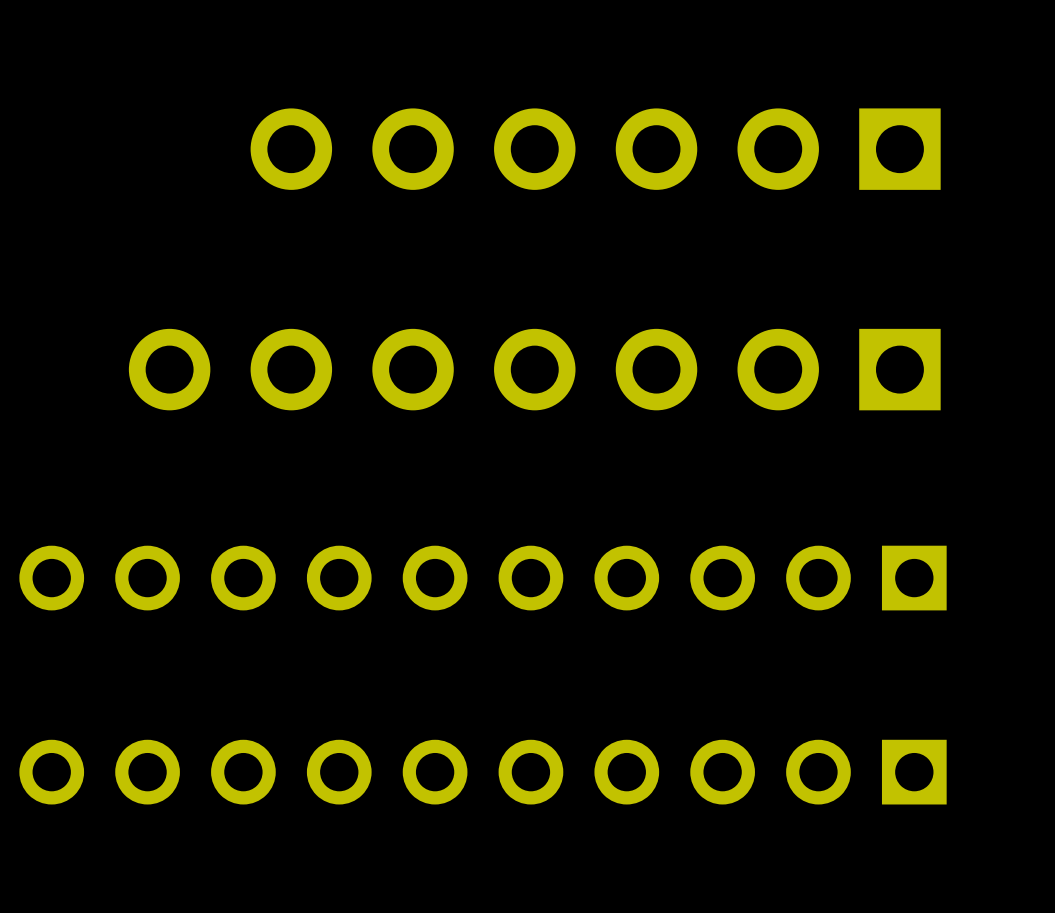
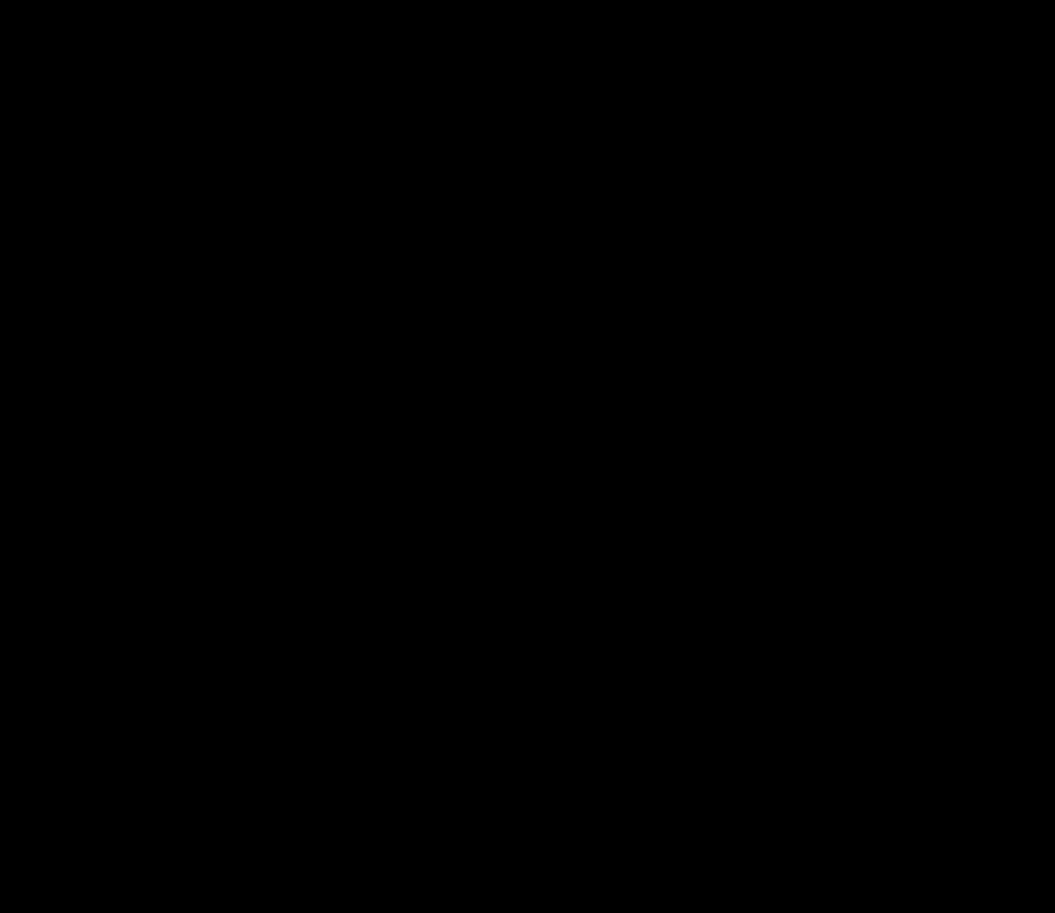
part: (595, 149) -> none
part: (534, 369) -> none
part: (483, 578) -> none
part: (483, 772) -> none

